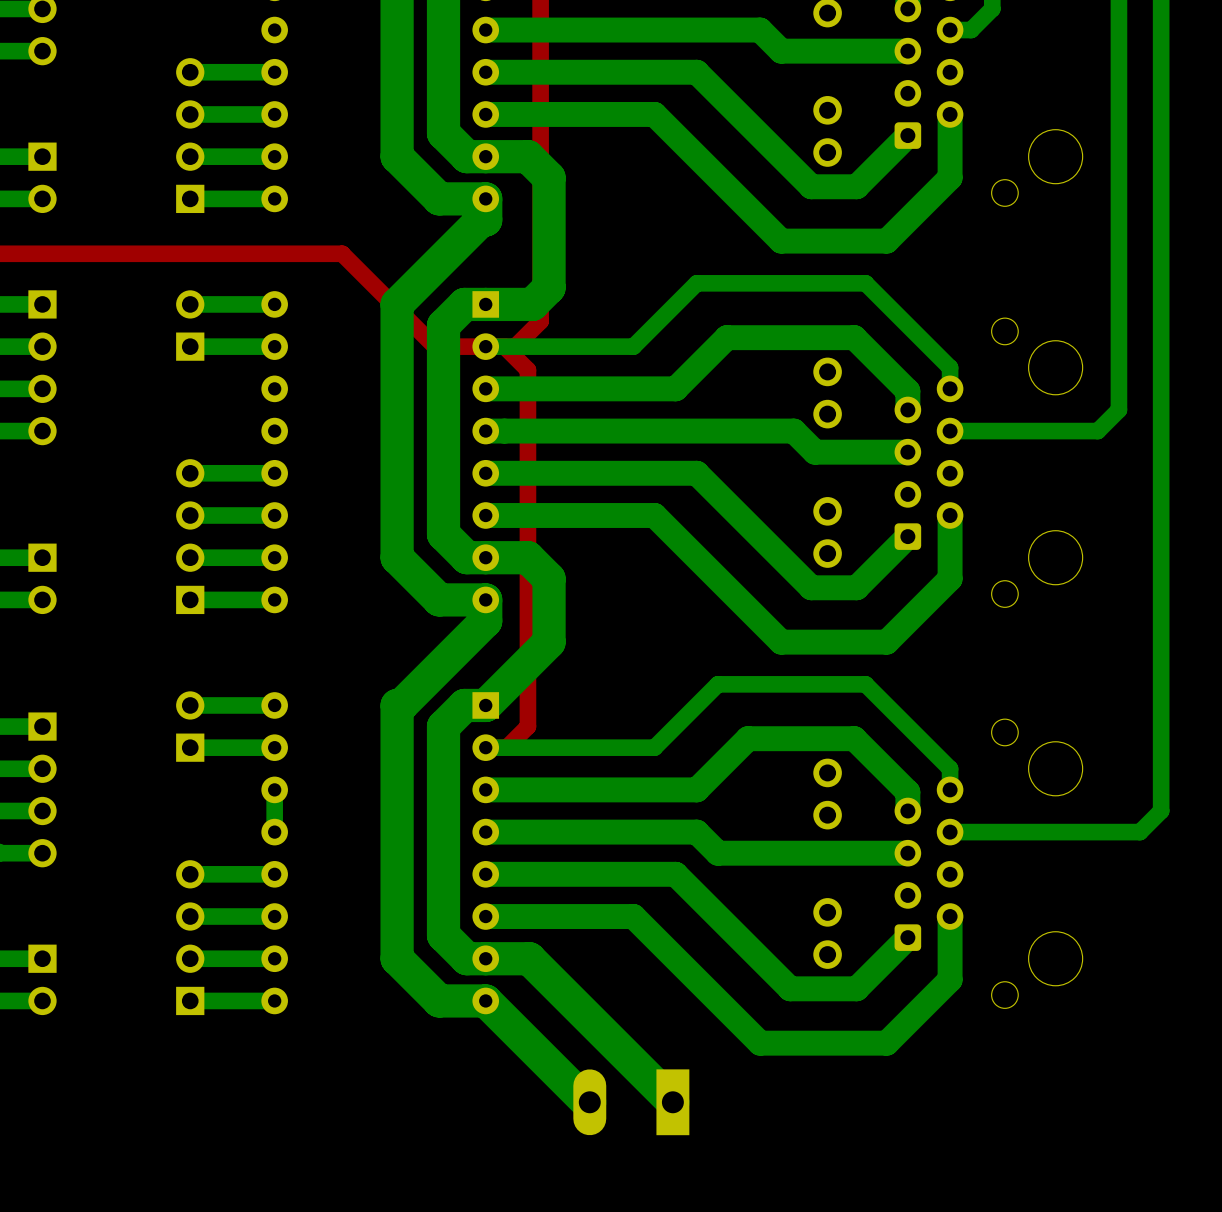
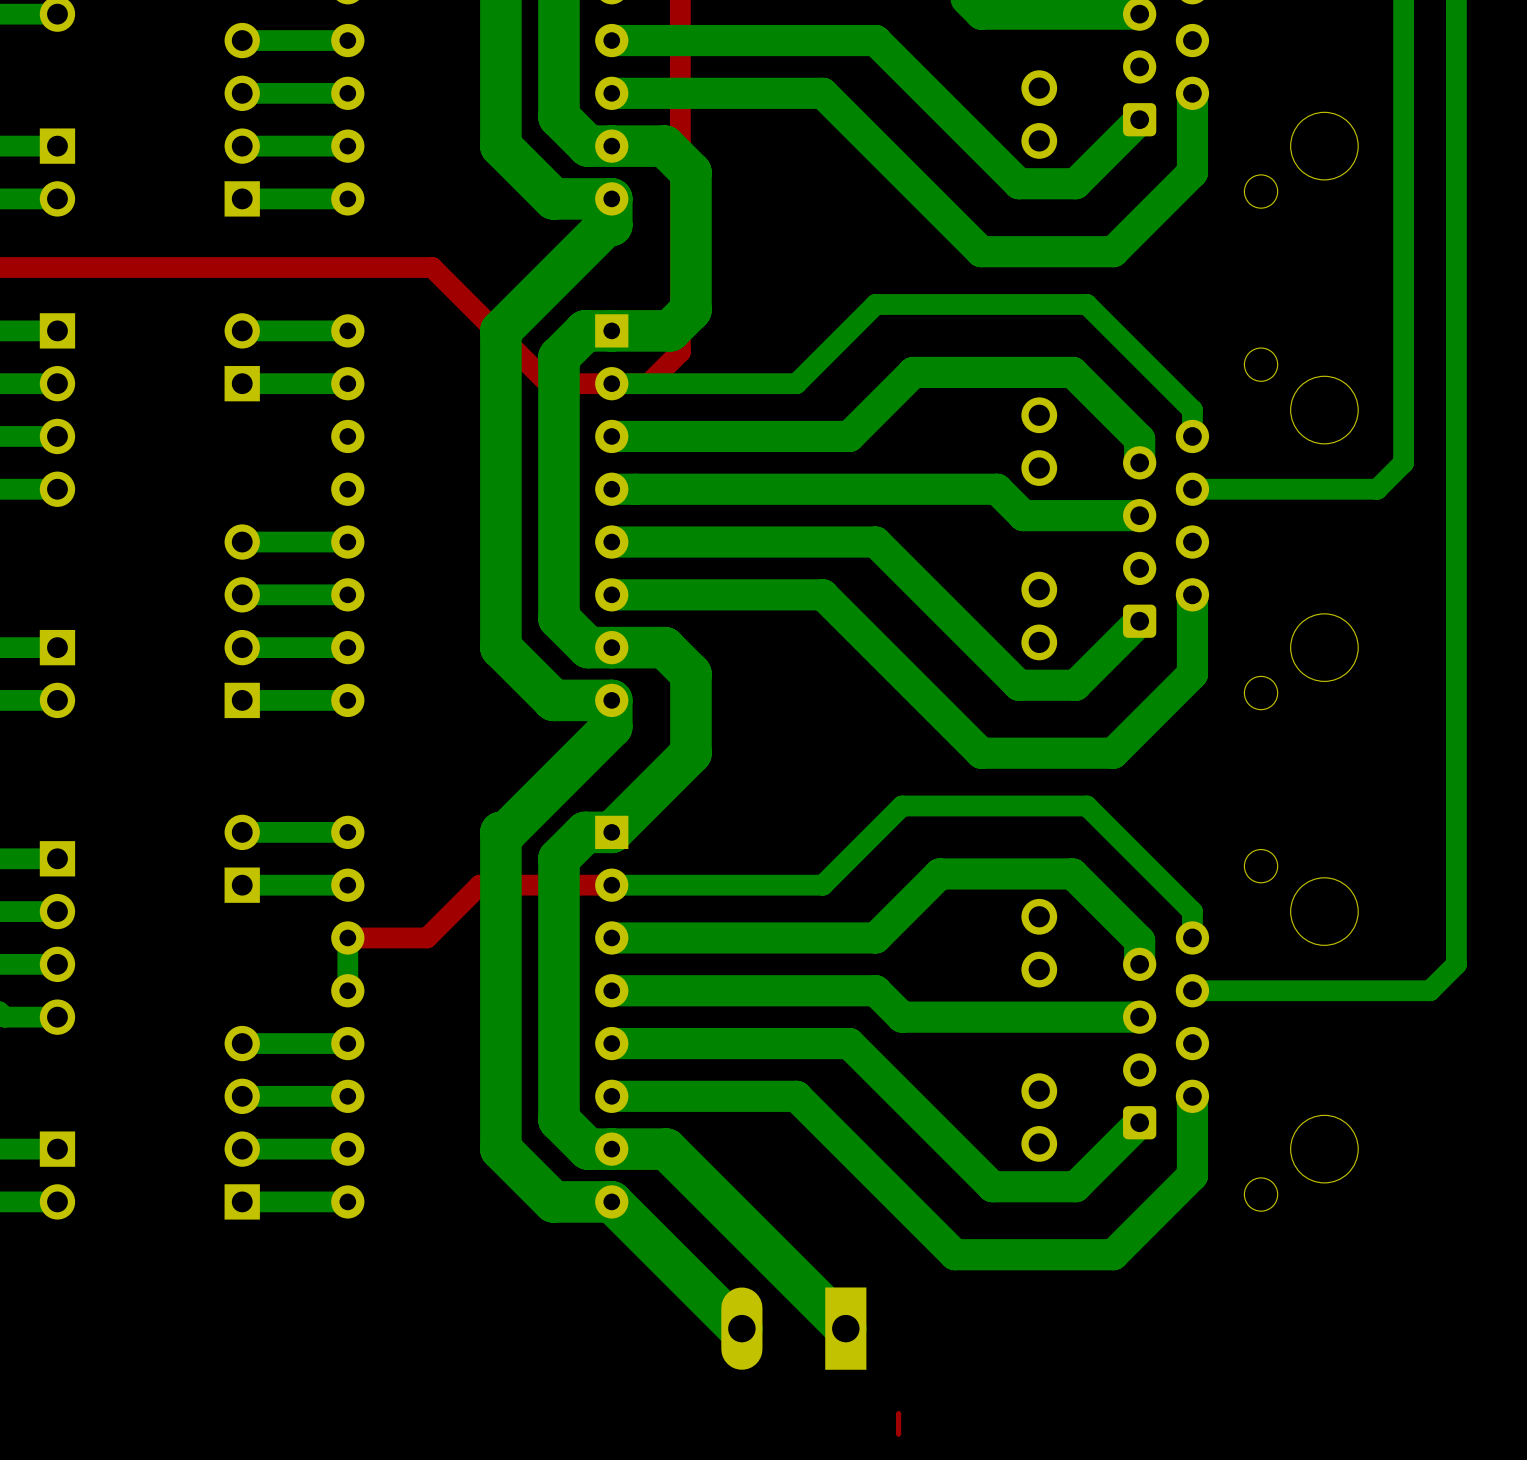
top track: (504, 346) (527, 370) (527, 726) (506, 747) (485, 747) -> (347, 937) (427, 937) (479, 885) (611, 885)
top track: none -> (898, 1413) (898, 1434)

